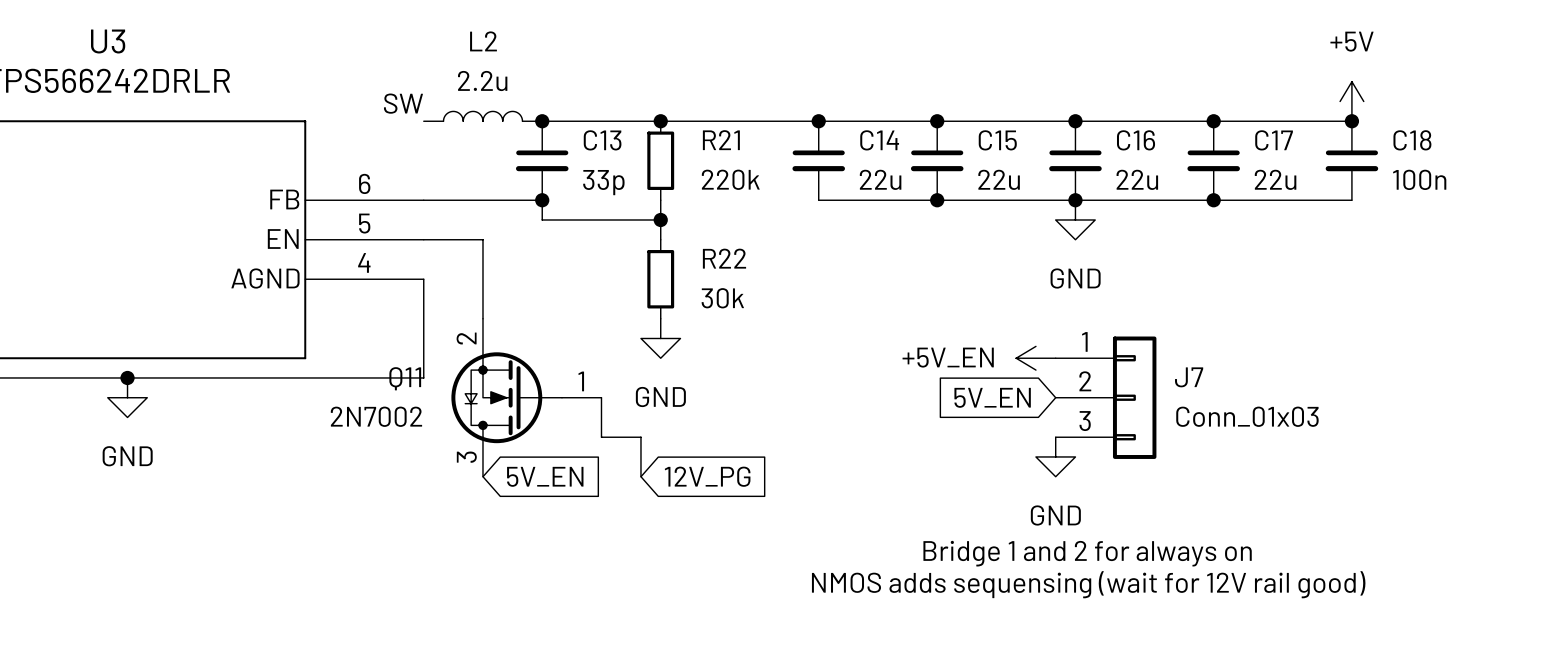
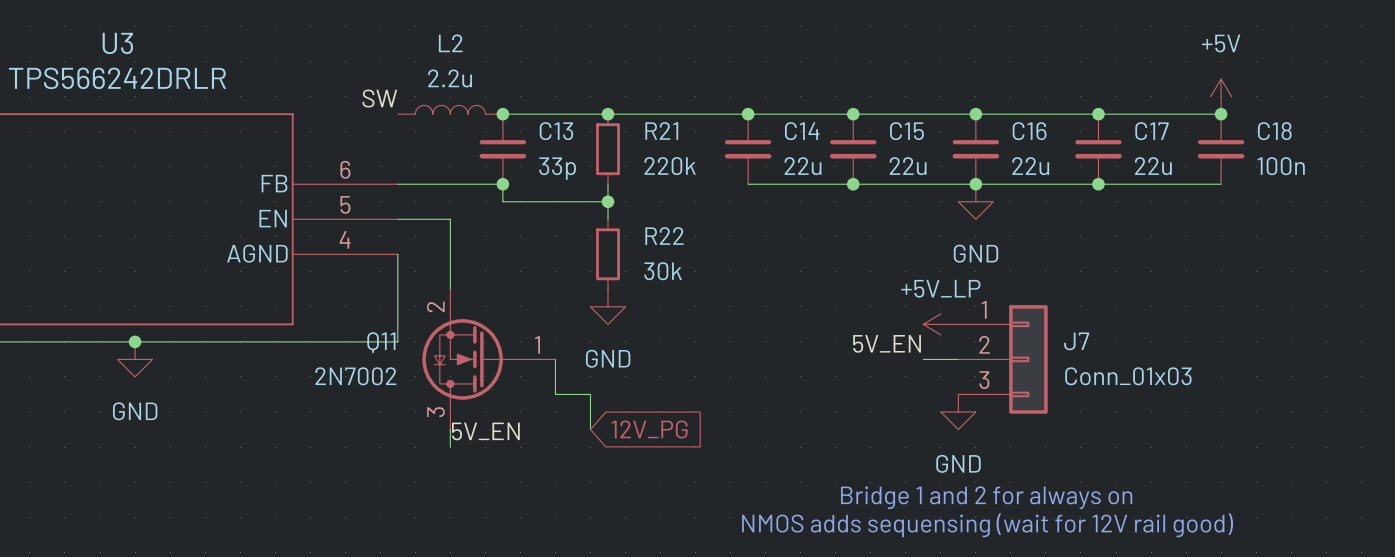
power symbol: +5V_EN (1035, 358) -> +5V_LP (940, 324)
label: none -> 5V_EN (887, 343)
global label: 5V_EN (992, 397) -> none
wire: none -> (923, 359) (958, 359)
wire: none -> (450, 429) (450, 447)
global label: 5V_EN (545, 476) -> none
label: none -> 5V_EN (485, 431)

